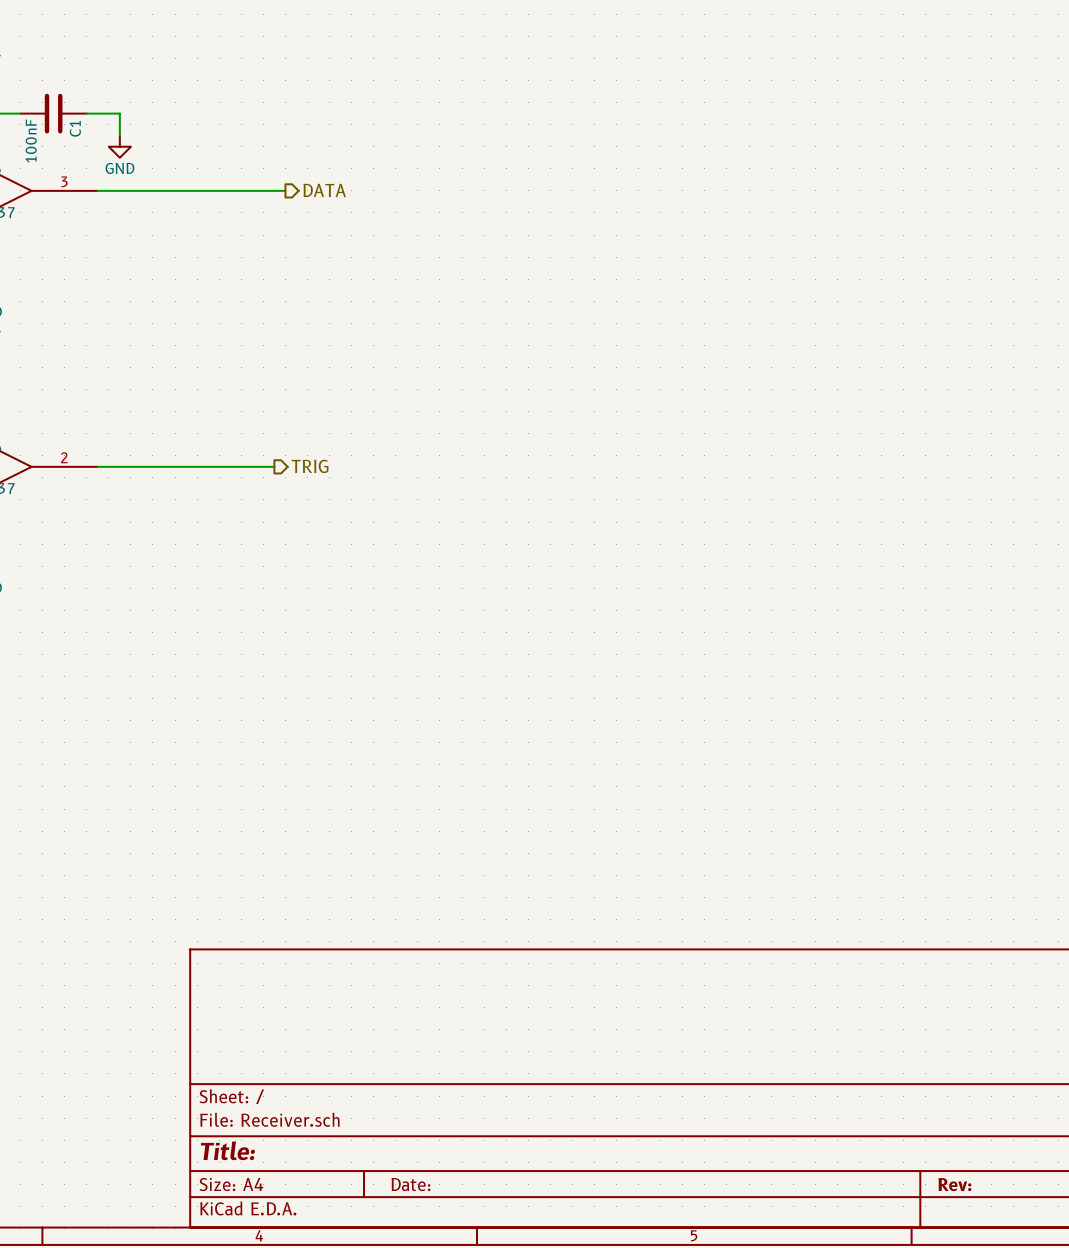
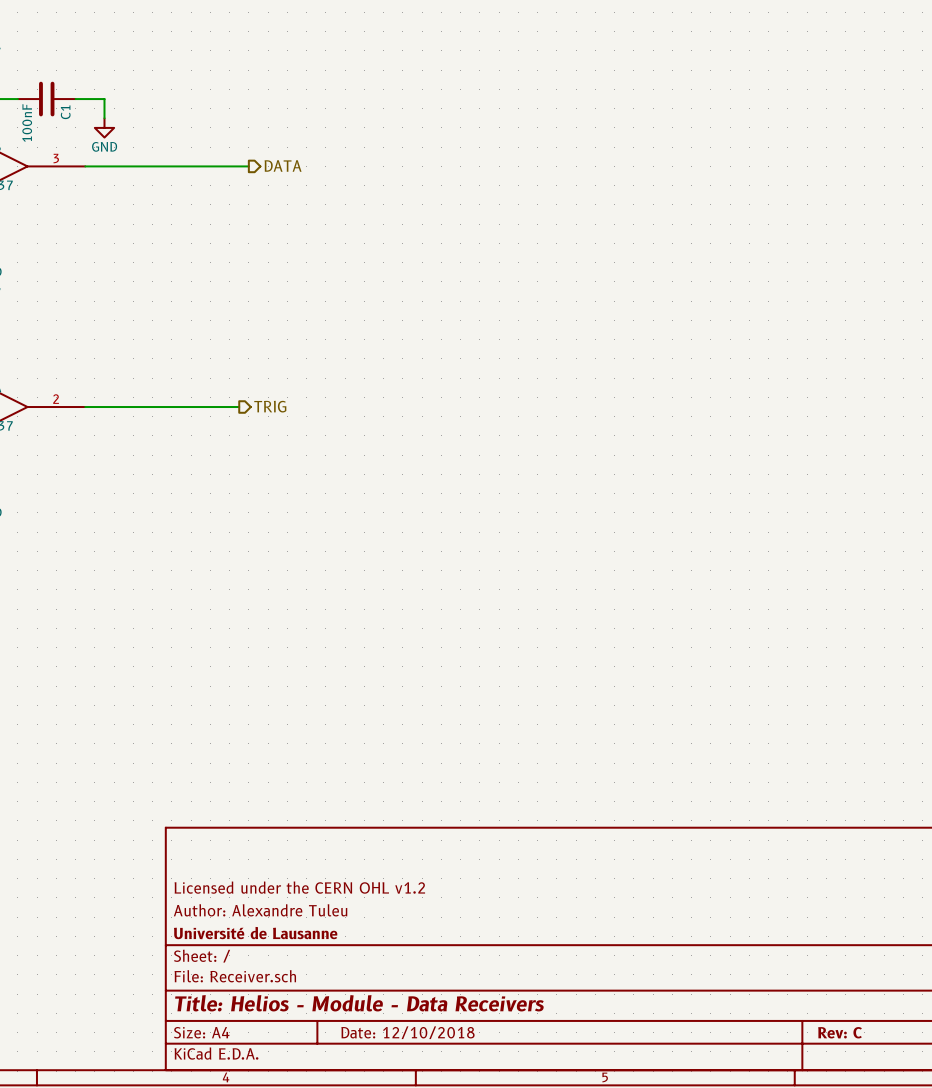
title block: none -> Licensed under the CERN OHL v1.2 (299, 887)
title block: none -> Author: Alexandre Tuleu (260, 910)
title block: none -> Université de Lausanne (255, 933)
title block: Title: (227, 1150) -> Title: Helios - Module - Data Receivers (359, 1003)
title block: Date: (410, 1184) -> Date: 12/10/2018 (407, 1032)
title block: Rev: (954, 1184) -> Rev: C (840, 1032)

